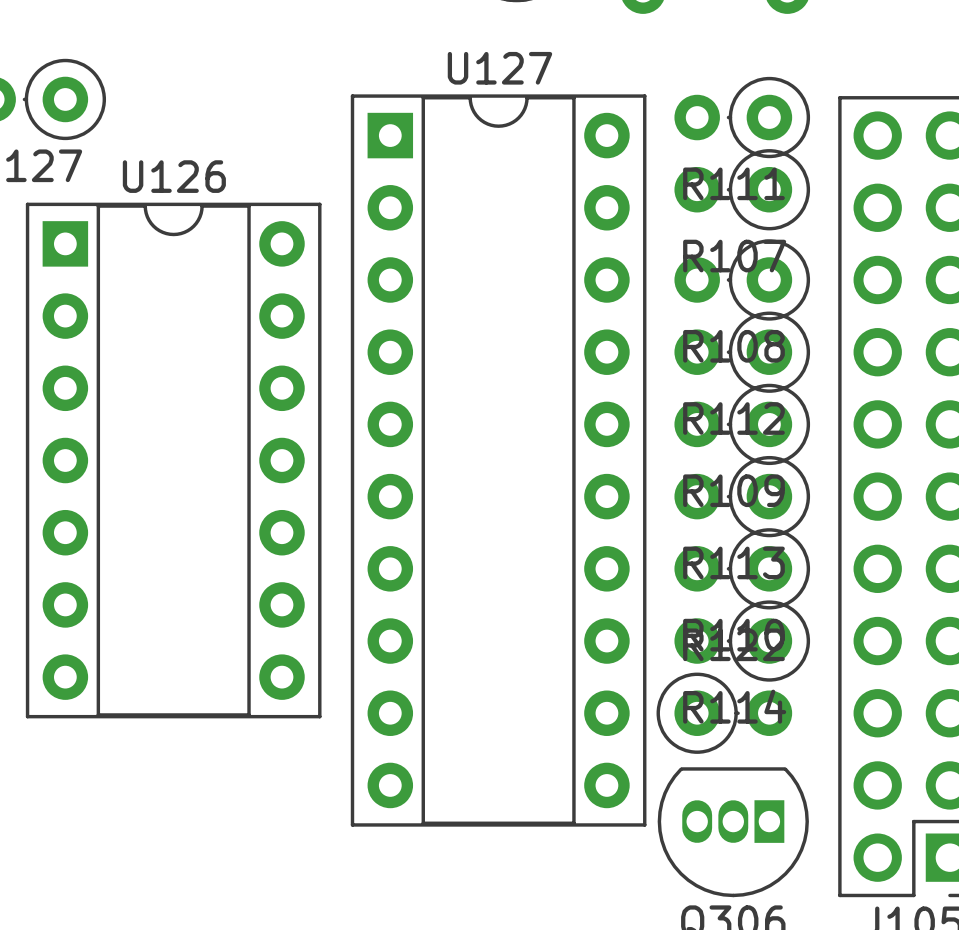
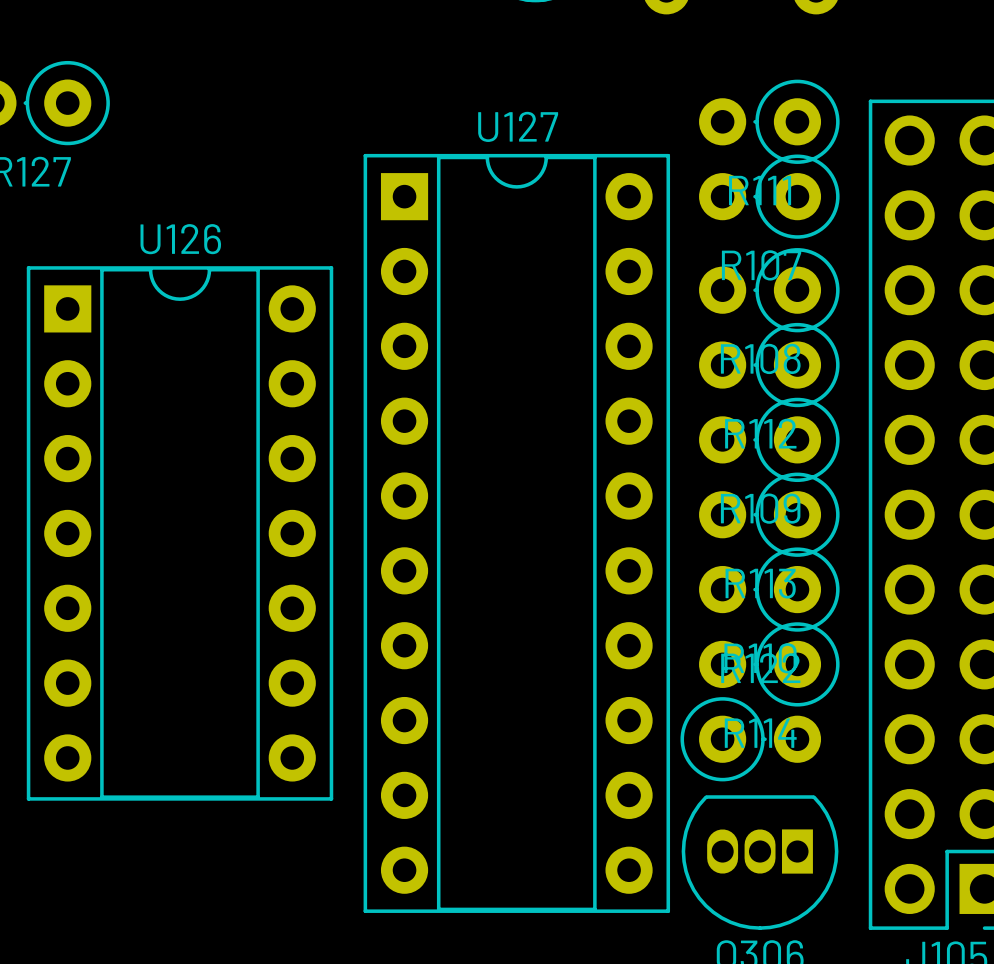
U126 position: (173, 460) -> (180, 533)
U127 position: (498, 460) -> (516, 533)

